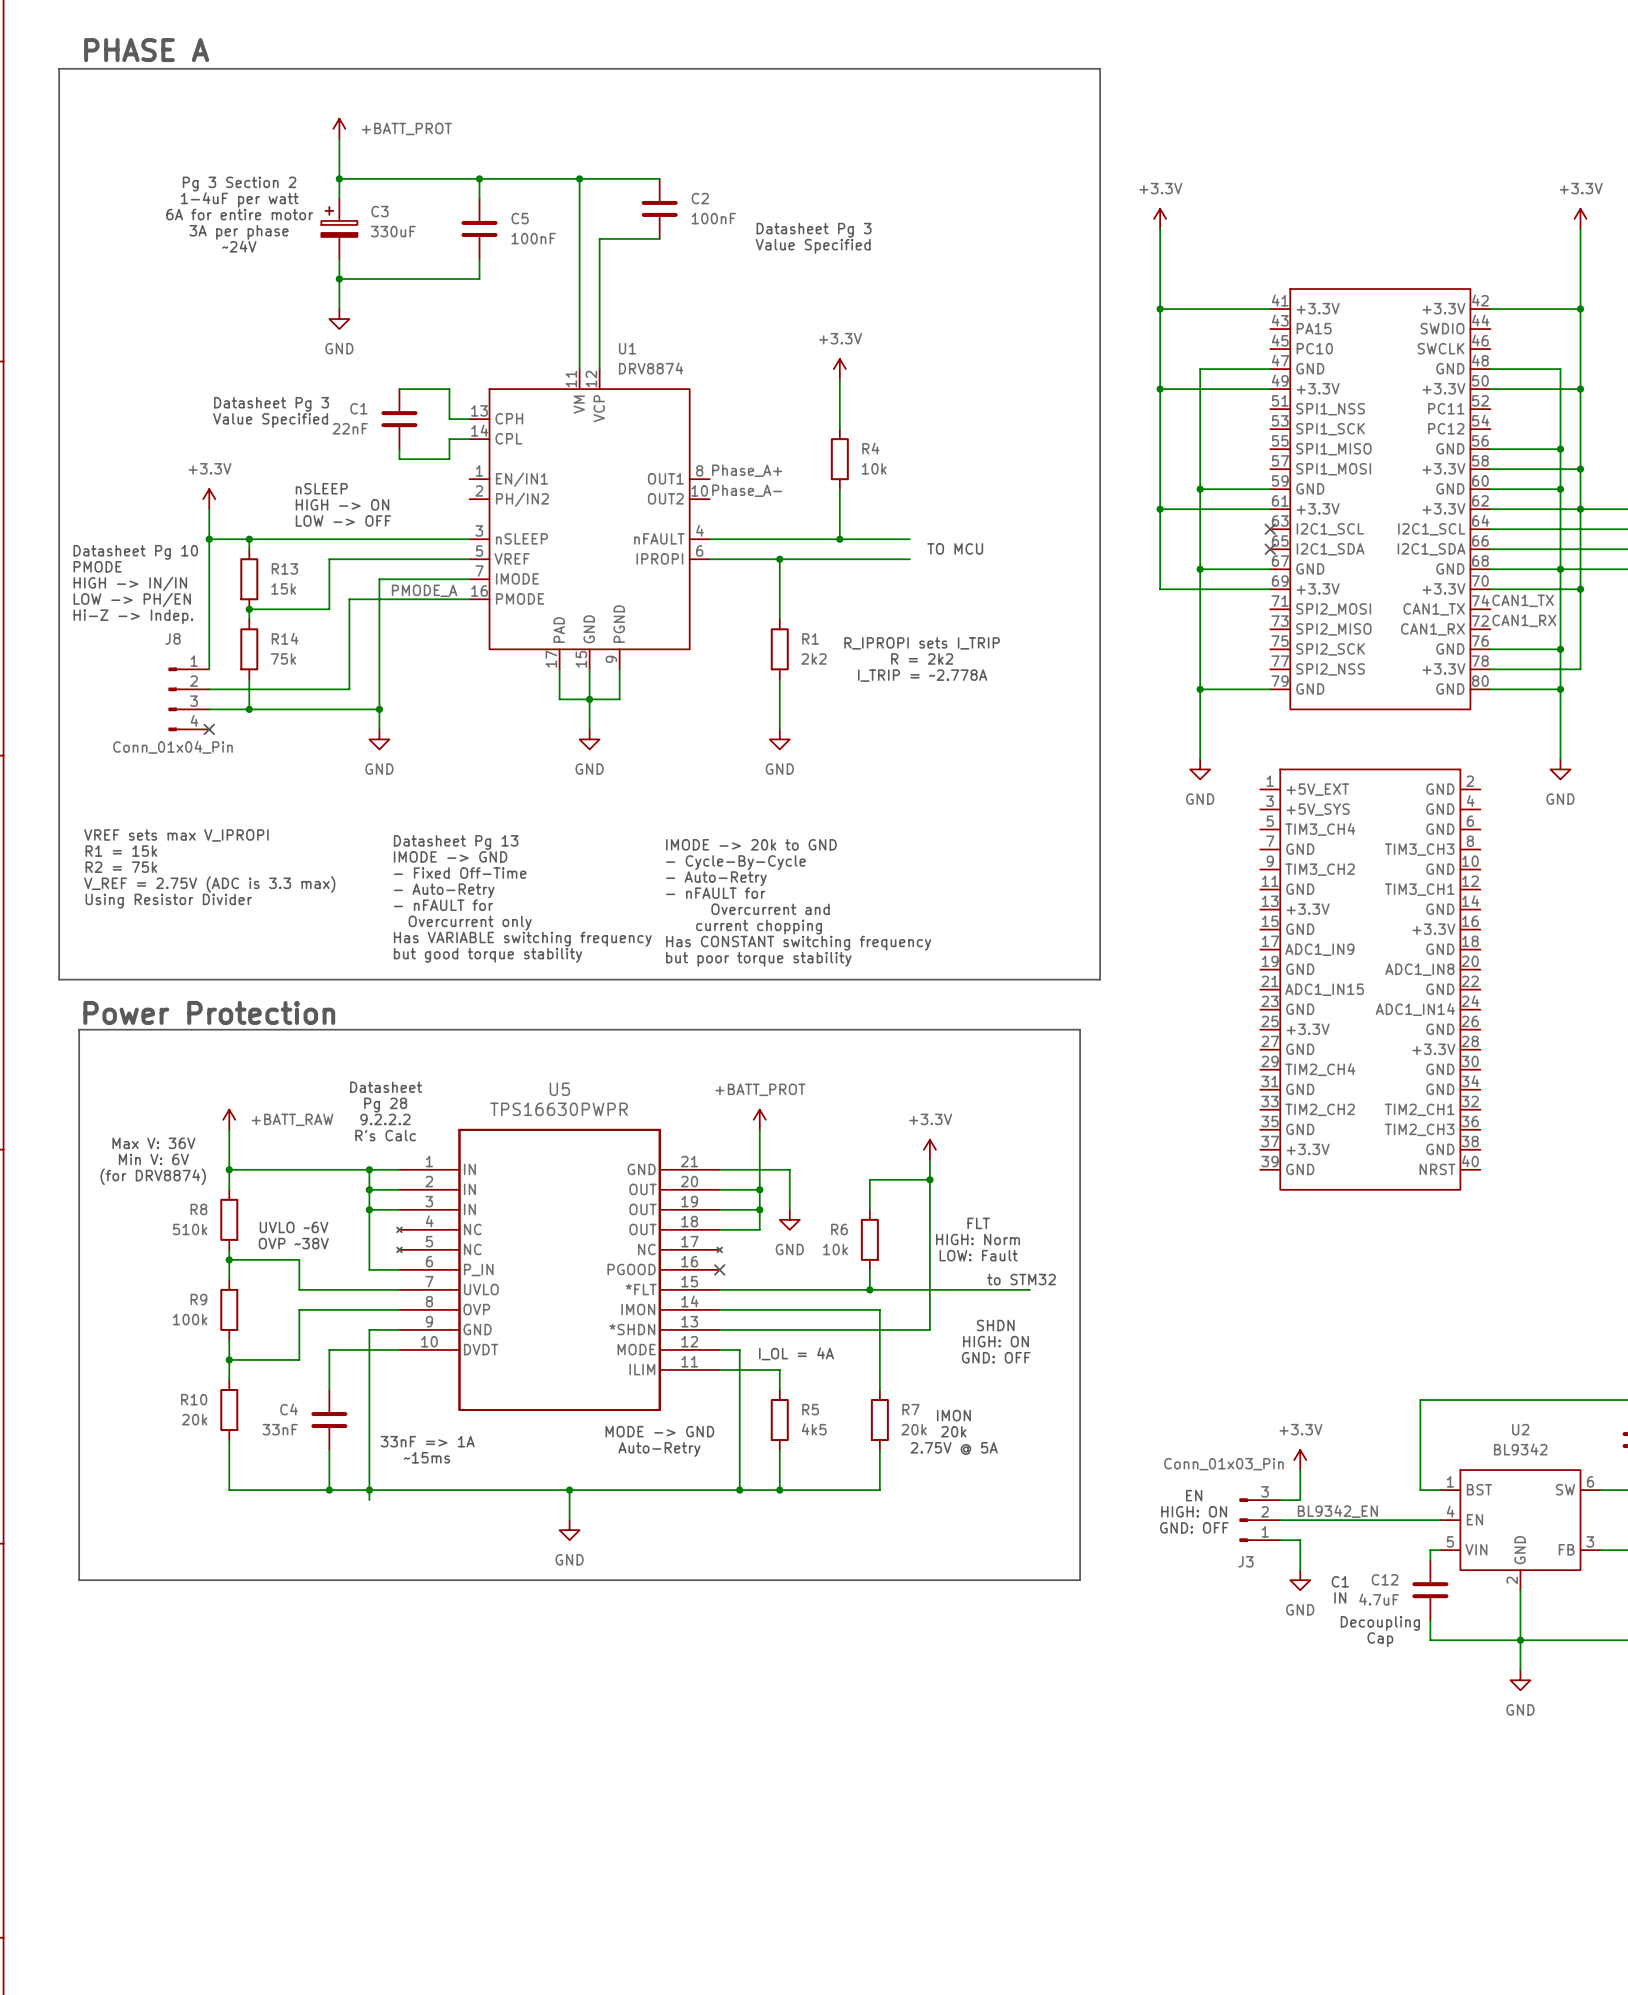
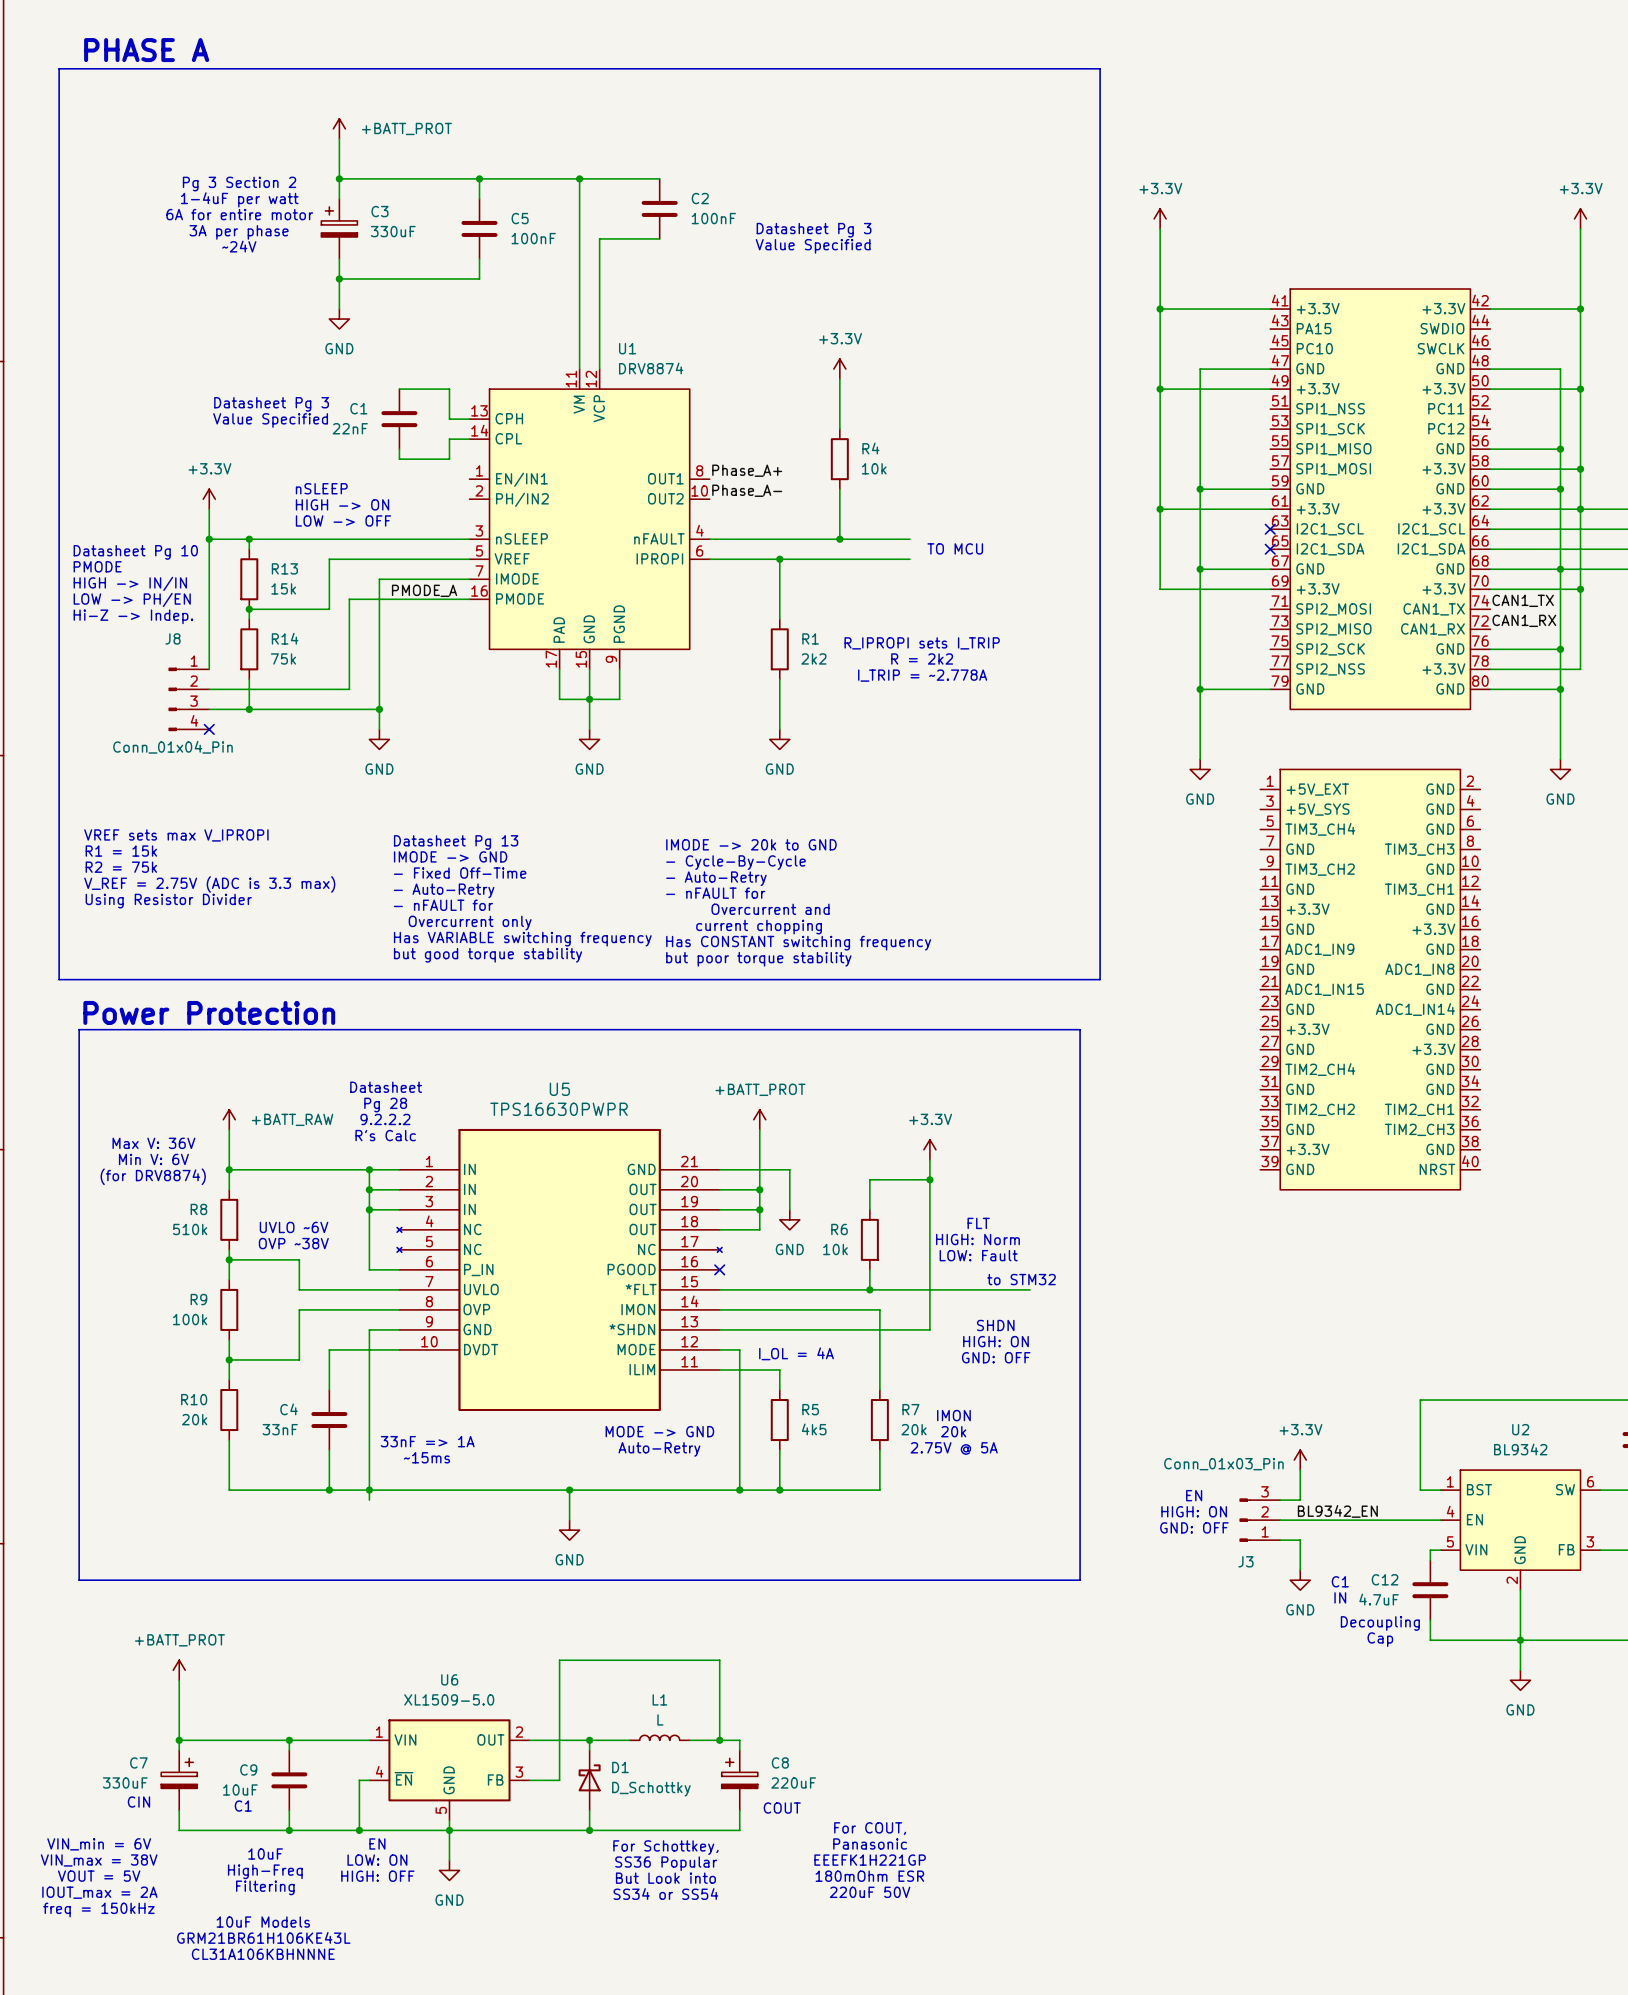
power symbol: none -> +BATT_PROT (179, 1670)
wire: none -> (179, 1680) (179, 1750)
L1: none -> L (659, 1737)
wire: none -> (179, 1740) (369, 1740)
junction: none -> (179, 1740)
wire: none -> (289, 1740) (289, 1750)
junction: none -> (289, 1740)
wire: none -> (529, 1740) (629, 1740)
wire: none -> (589, 1740) (589, 1750)
junction: none -> (589, 1740)
wire: none -> (689, 1740) (739, 1740) (739, 1750)
wire: none -> (719, 1740) (719, 1660) (559, 1660) (559, 1780) (529, 1780)
junction: none -> (719, 1740)
U6: none -> XL1509-5.0 (449, 1769)
C7: none -> 330uF (179, 1780)
C9: none -> 10uF (289, 1780)
wire: none -> (369, 1780) (359, 1780) (359, 1830)
D1: none -> D_Schottky (589, 1780)
C8: none -> 220uF (739, 1780)
text: none -> CIN (138, 1802)
text: none -> C1 (243, 1806)
text: none -> COUT (782, 1808)
wire: none -> (179, 1810) (179, 1830) (739, 1830) (739, 1810)
wire: none -> (289, 1810) (289, 1830)
wire: none -> (589, 1810) (589, 1830)
wire: none -> (449, 1820) (449, 1860)
text: none -> For COUT, (870, 1828)
junction: none -> (289, 1830)
junction: none -> (359, 1830)
junction: none -> (449, 1830)
junction: none -> (589, 1830)
text: none -> EN (377, 1843)
text: none -> Panasonic (870, 1843)
text: none -> VIN_min = 6V (99, 1844)
text: none -> For Schottkey, (665, 1847)
text: none -> 10uF (265, 1853)
text: none -> VIN_max = 38V (99, 1860)
text: none -> LOW: ON (377, 1860)
text: none -> EEEFK1H221GP (870, 1860)
text: none -> SS36 Popular (666, 1863)
power symbol: none -> GND (449, 1870)
text: none -> High-Freq (265, 1871)
text: none -> VOUT = 5V (99, 1876)
text: none -> HIGH: OFF (377, 1876)
text: none -> 180mOhm ESR (869, 1876)
text: none -> But Look into (665, 1878)
text: none -> Filtering (265, 1887)
text: none -> IOUT_max = 2A (99, 1892)
text: none -> 220uF 50V (870, 1892)
text: none -> SS34 or SS54 (665, 1894)
text: none -> freq = 150kHz (98, 1910)
text: none -> 10uF Models (263, 1922)
text: none -> GRM21BR61H106KE43L (263, 1937)
text: none -> CL31A106KBHNNNE (263, 1954)

